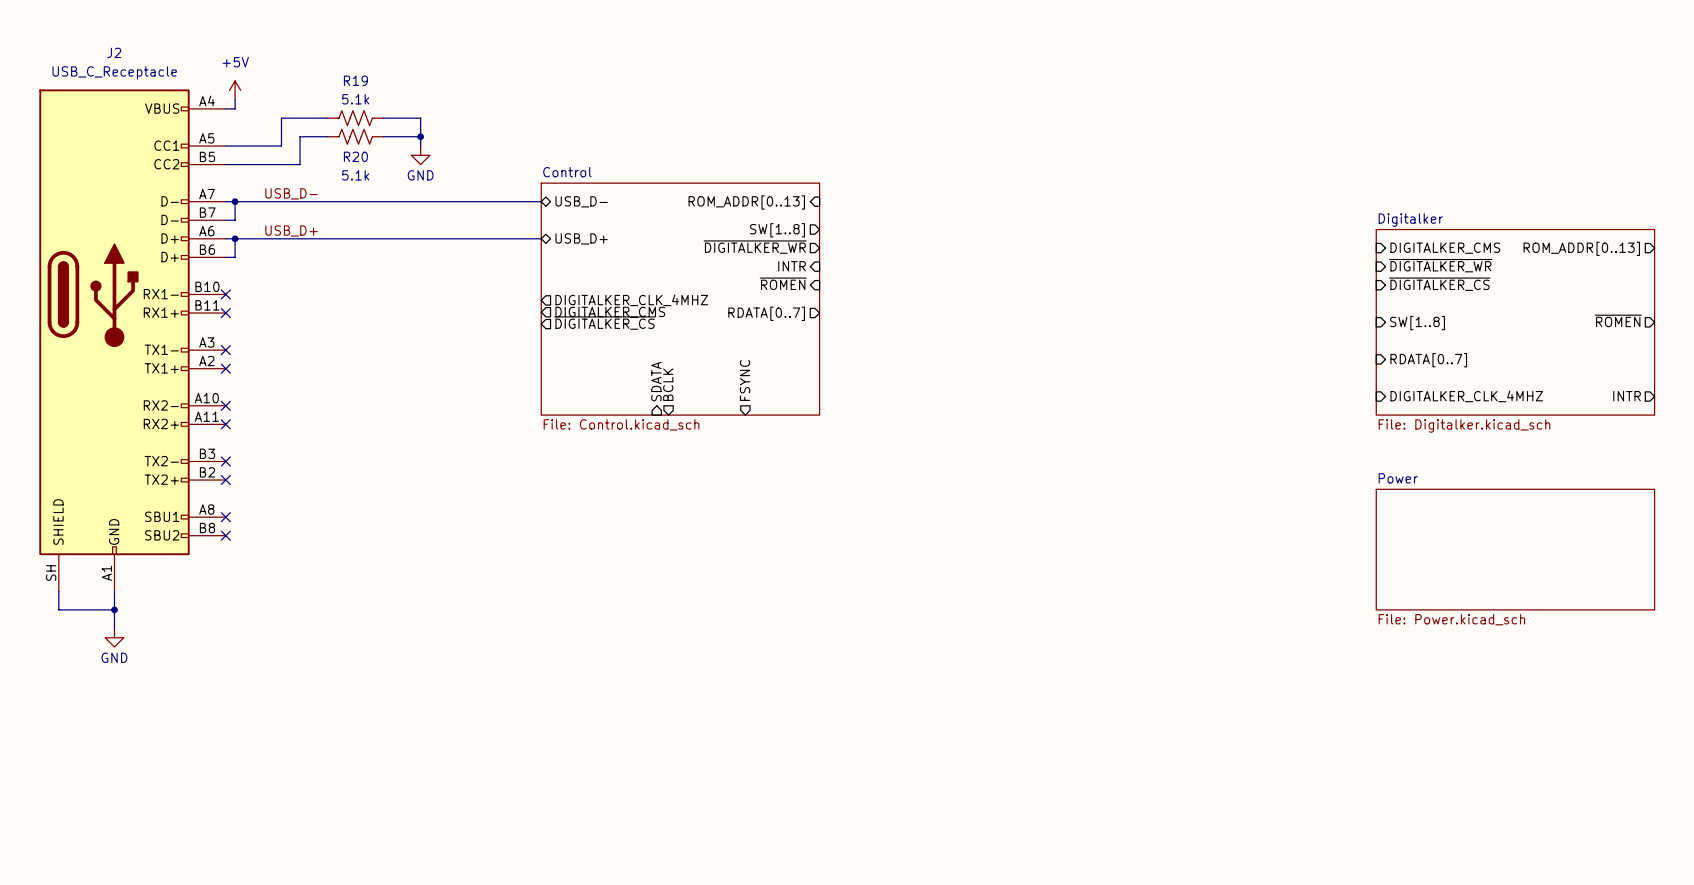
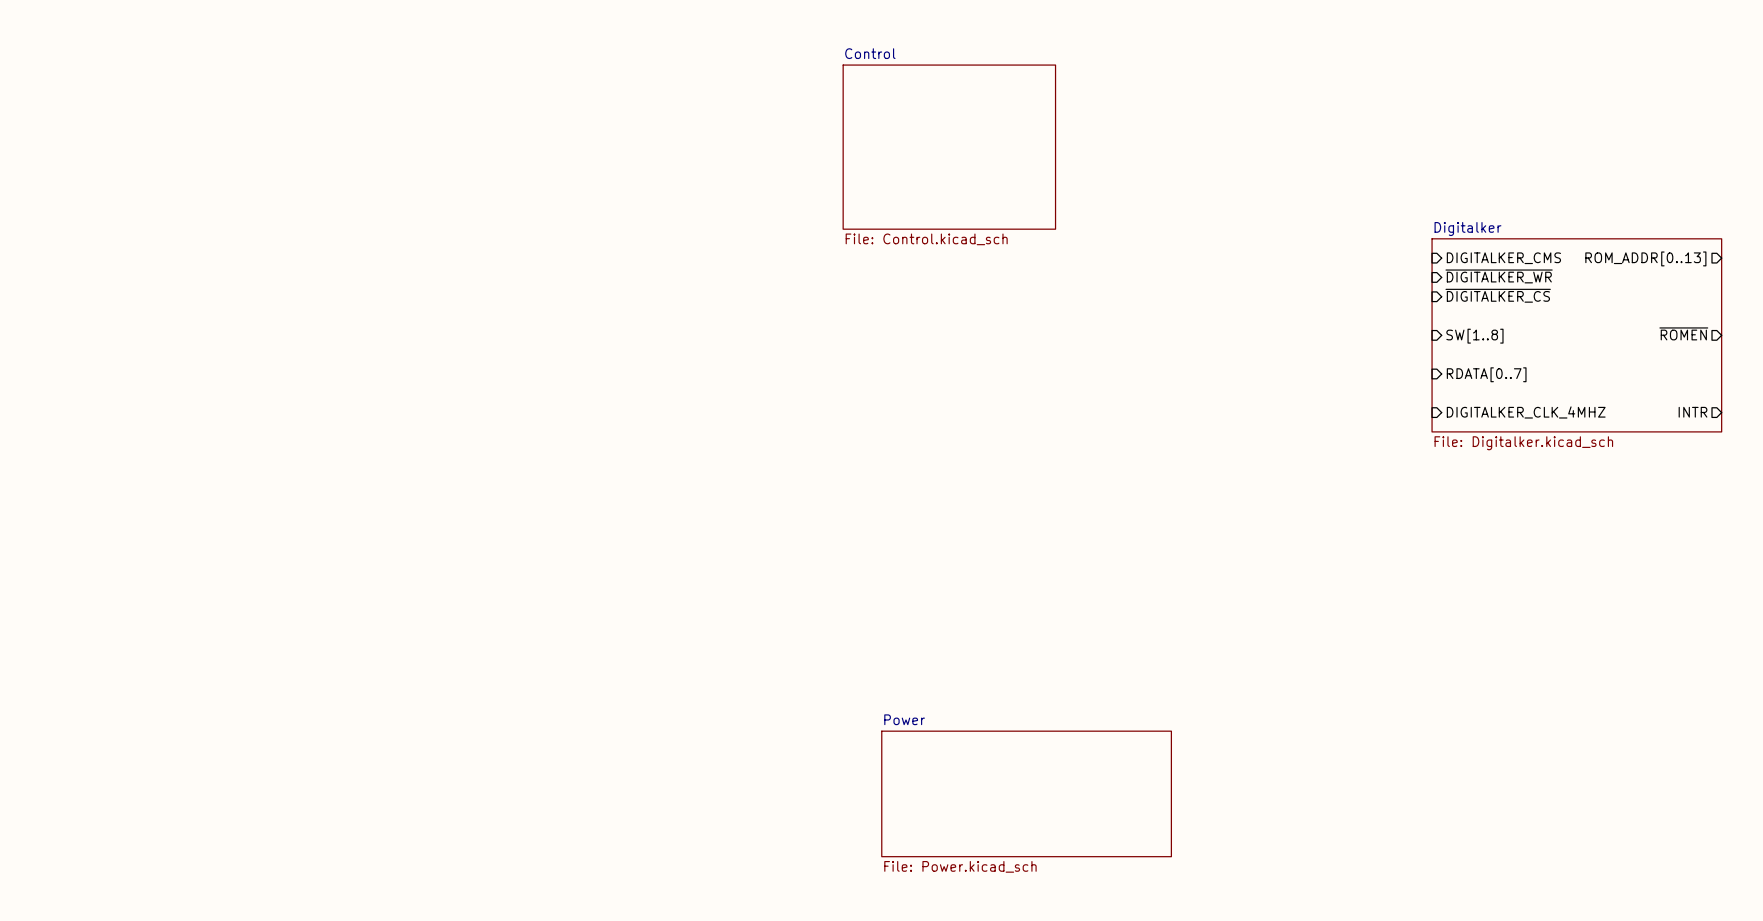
power symbol: +5V (235, 90) -> none
wire: (235, 99) (235, 108) (225, 108) -> none
wire: (327, 118) (281, 118) (281, 146) (225, 146) -> none
R19: 5.1k (355, 118) -> none
wire: (383, 118) (420, 118) (420, 146) -> none
wire: (327, 136) (300, 136) (300, 164) (225, 164) -> none
R20: 5.1k (355, 136) -> none
wire: (383, 136) (420, 136) -> none
junction: (420, 136) -> none
sheet Control: none -> File: Control.kicad_sch (949, 147)
power symbol: GND (420, 155) -> none
label: USB_D- (291, 193) -> none
wire: (225, 201) (541, 201) -> none
wire: (235, 201) (235, 220) (225, 220) -> none
junction: (235, 201) -> none
sheet pin: USB_D- (581, 201) -> none
sheet pin: ROM_ADDR[0..13] (746, 202) -> none
label: USB_D+ (291, 230) -> none
sheet pin: SW[1..8] (777, 230) -> none
wire: (225, 238) (541, 238) -> none
wire: (235, 238) (235, 257) (225, 257) -> none
junction: (235, 238) -> none
sheet pin: USB_D+ (581, 238) -> none
sheet pin: ~{DIGITALKER_WR} (755, 247) -> none
sheet pin: INTR (792, 266) -> none
sheet pin: ~{ROMEN} (783, 283) -> none
no-connect mark: (225, 294) -> none
sheet Control: File: Control.kicad_sch (680, 299) -> none
sheet pin: DIGITALKER_CLK_4MHZ (631, 300) -> none
sheet pin: DIGITALKER_CMS (610, 312) -> none
no-connect mark: (225, 313) -> none
sheet pin: RDATA[0..7] (766, 313) -> none
sheet pin: ~{DIGITALKER_CS} (604, 323) -> none
J2: USB_C_Receptacle (132, 340) -> none
no-connect mark: (225, 350) -> none
no-connect mark: (225, 368) -> none
sheet pin: FSYNC (745, 380) -> none
sheet pin: SDATA (656, 381) -> none
sheet pin: BCLK (668, 384) -> none
no-connect mark: (225, 405) -> none
no-connect mark: (225, 424) -> none
no-connect mark: (225, 461) -> none
no-connect mark: (225, 480) -> none
no-connect mark: (225, 517) -> none
no-connect mark: (225, 535) -> none
sheet Power: File: Power.kicad_sch (1515, 549) -> none
wire: (58, 591) (58, 609) (114, 609) -> none
wire: (114, 591) (114, 628) -> none
junction: (114, 609) -> none
power symbol: GND (114, 637) -> none
sheet Power: none -> File: Power.kicad_sch (1026, 793)

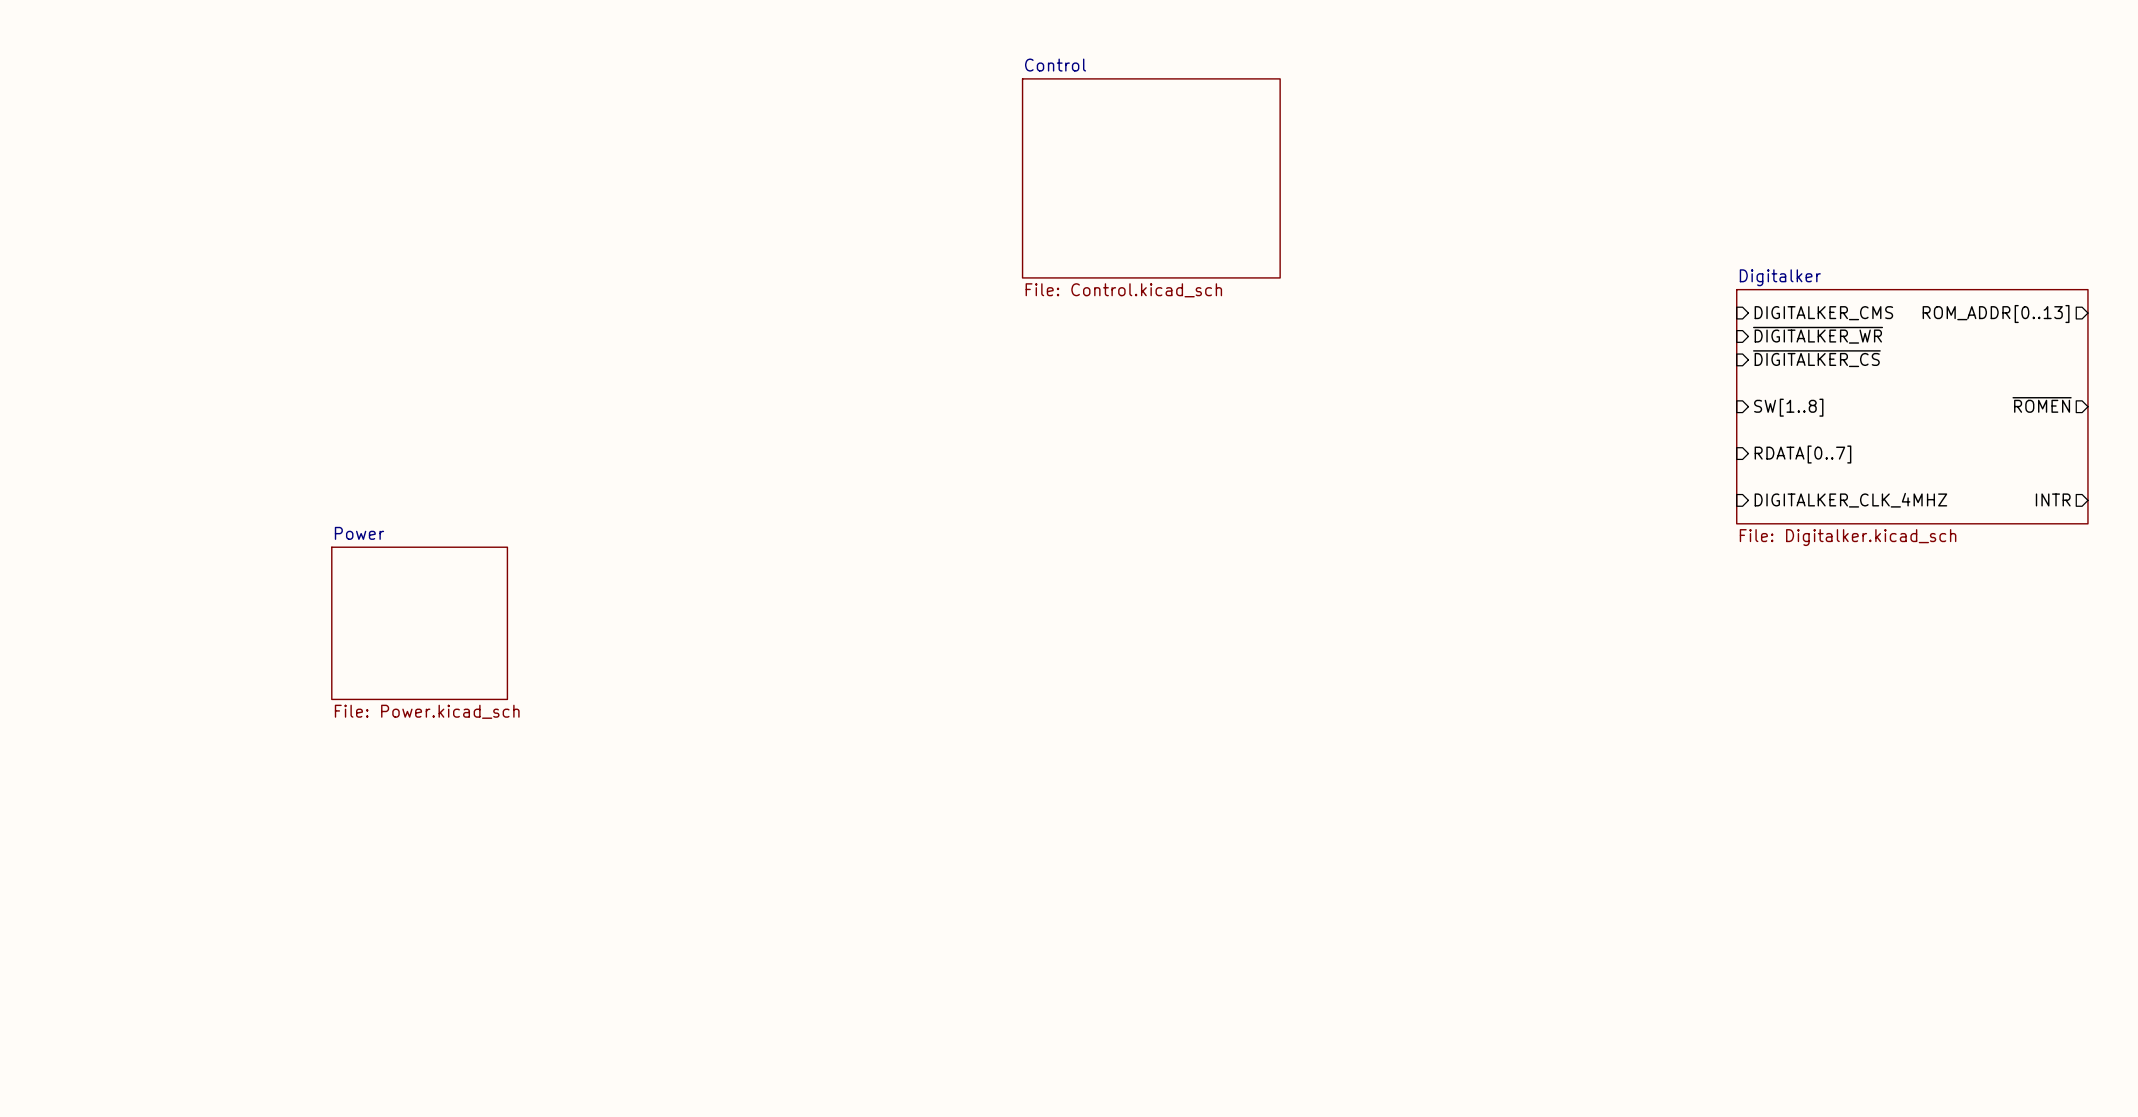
sheet Power: none -> File: Power.kicad_sch (419, 623)
sheet Power: File: Power.kicad_sch (1026, 793) -> none

